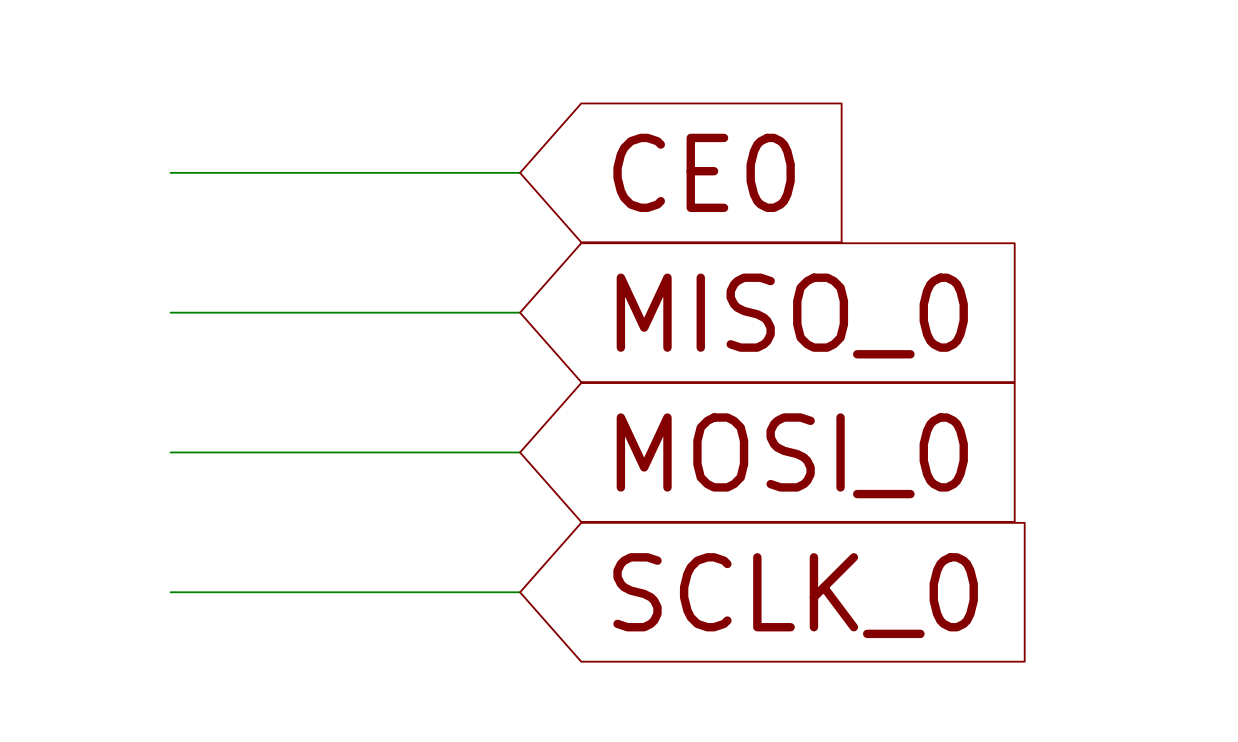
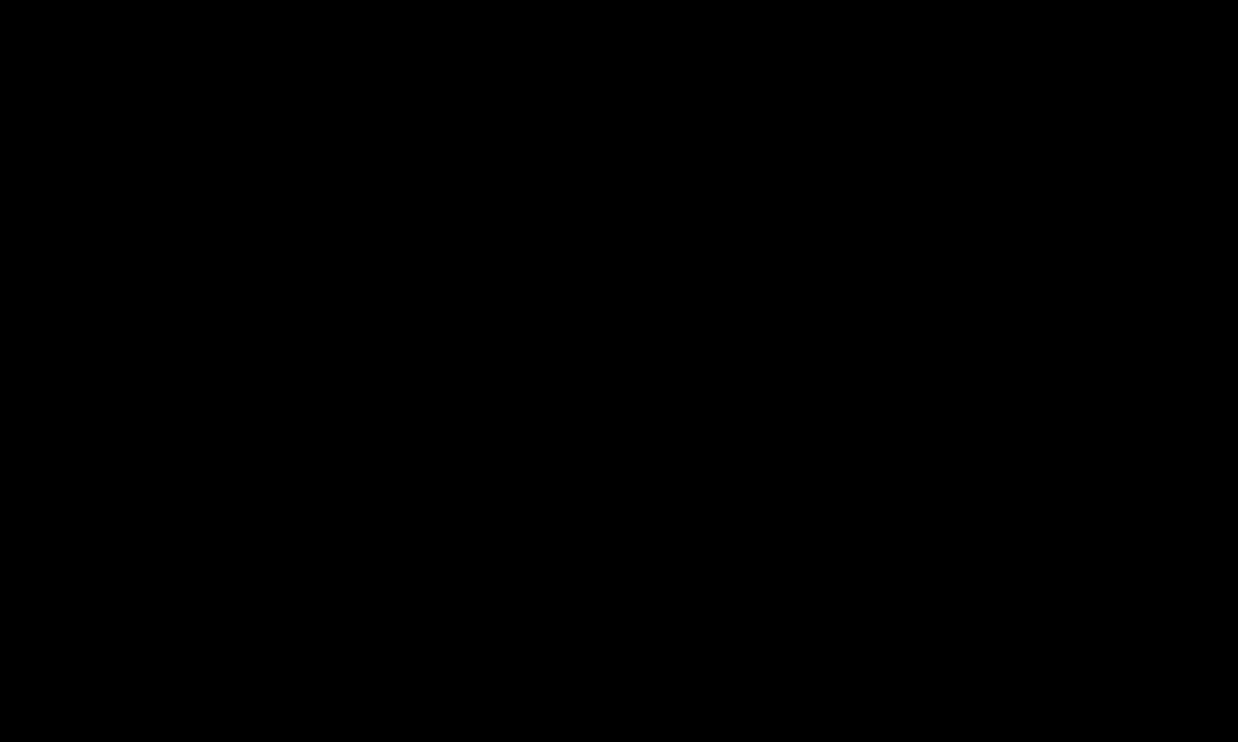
wire: (170, 172) (520, 172) -> none
global label: CE0 (704, 172) -> none
wire: (170, 312) (520, 312) -> none
global label: MISO_0 (792, 316) -> none
wire: (170, 452) (520, 452) -> none
global label: MOSI_0 (792, 455) -> none
wire: (170, 592) (520, 592) -> none
global label: SCLK_0 (795, 595) -> none

